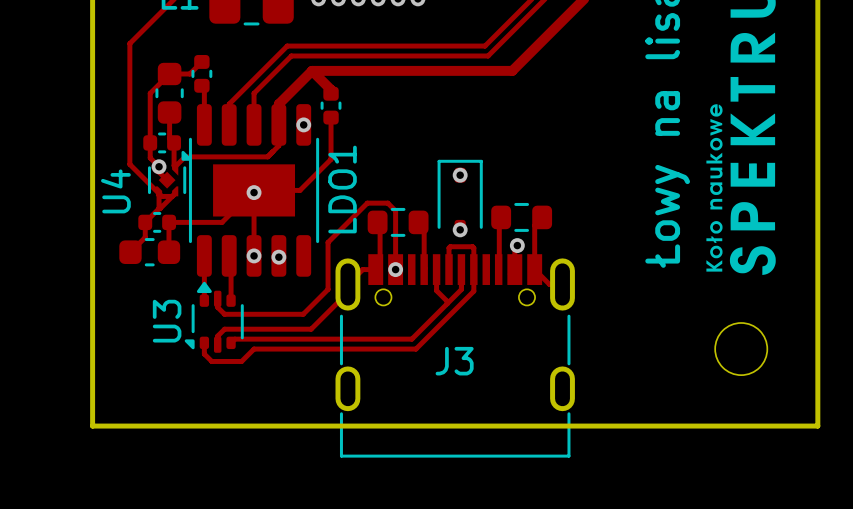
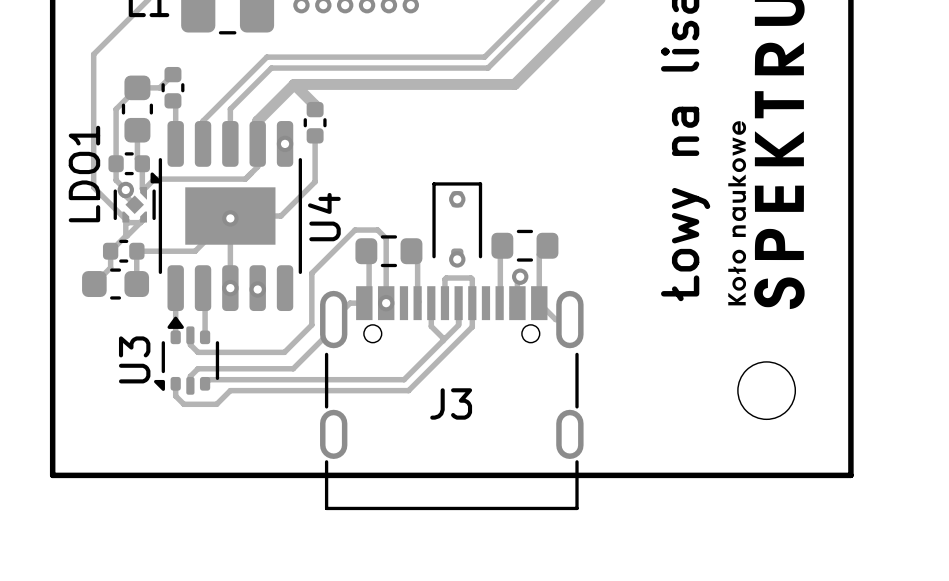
LDO1 name position: LDO1 (342, 189) -> LDO1 (84, 174)
U4 name position: U4 (115, 191) -> U4 (324, 217)

